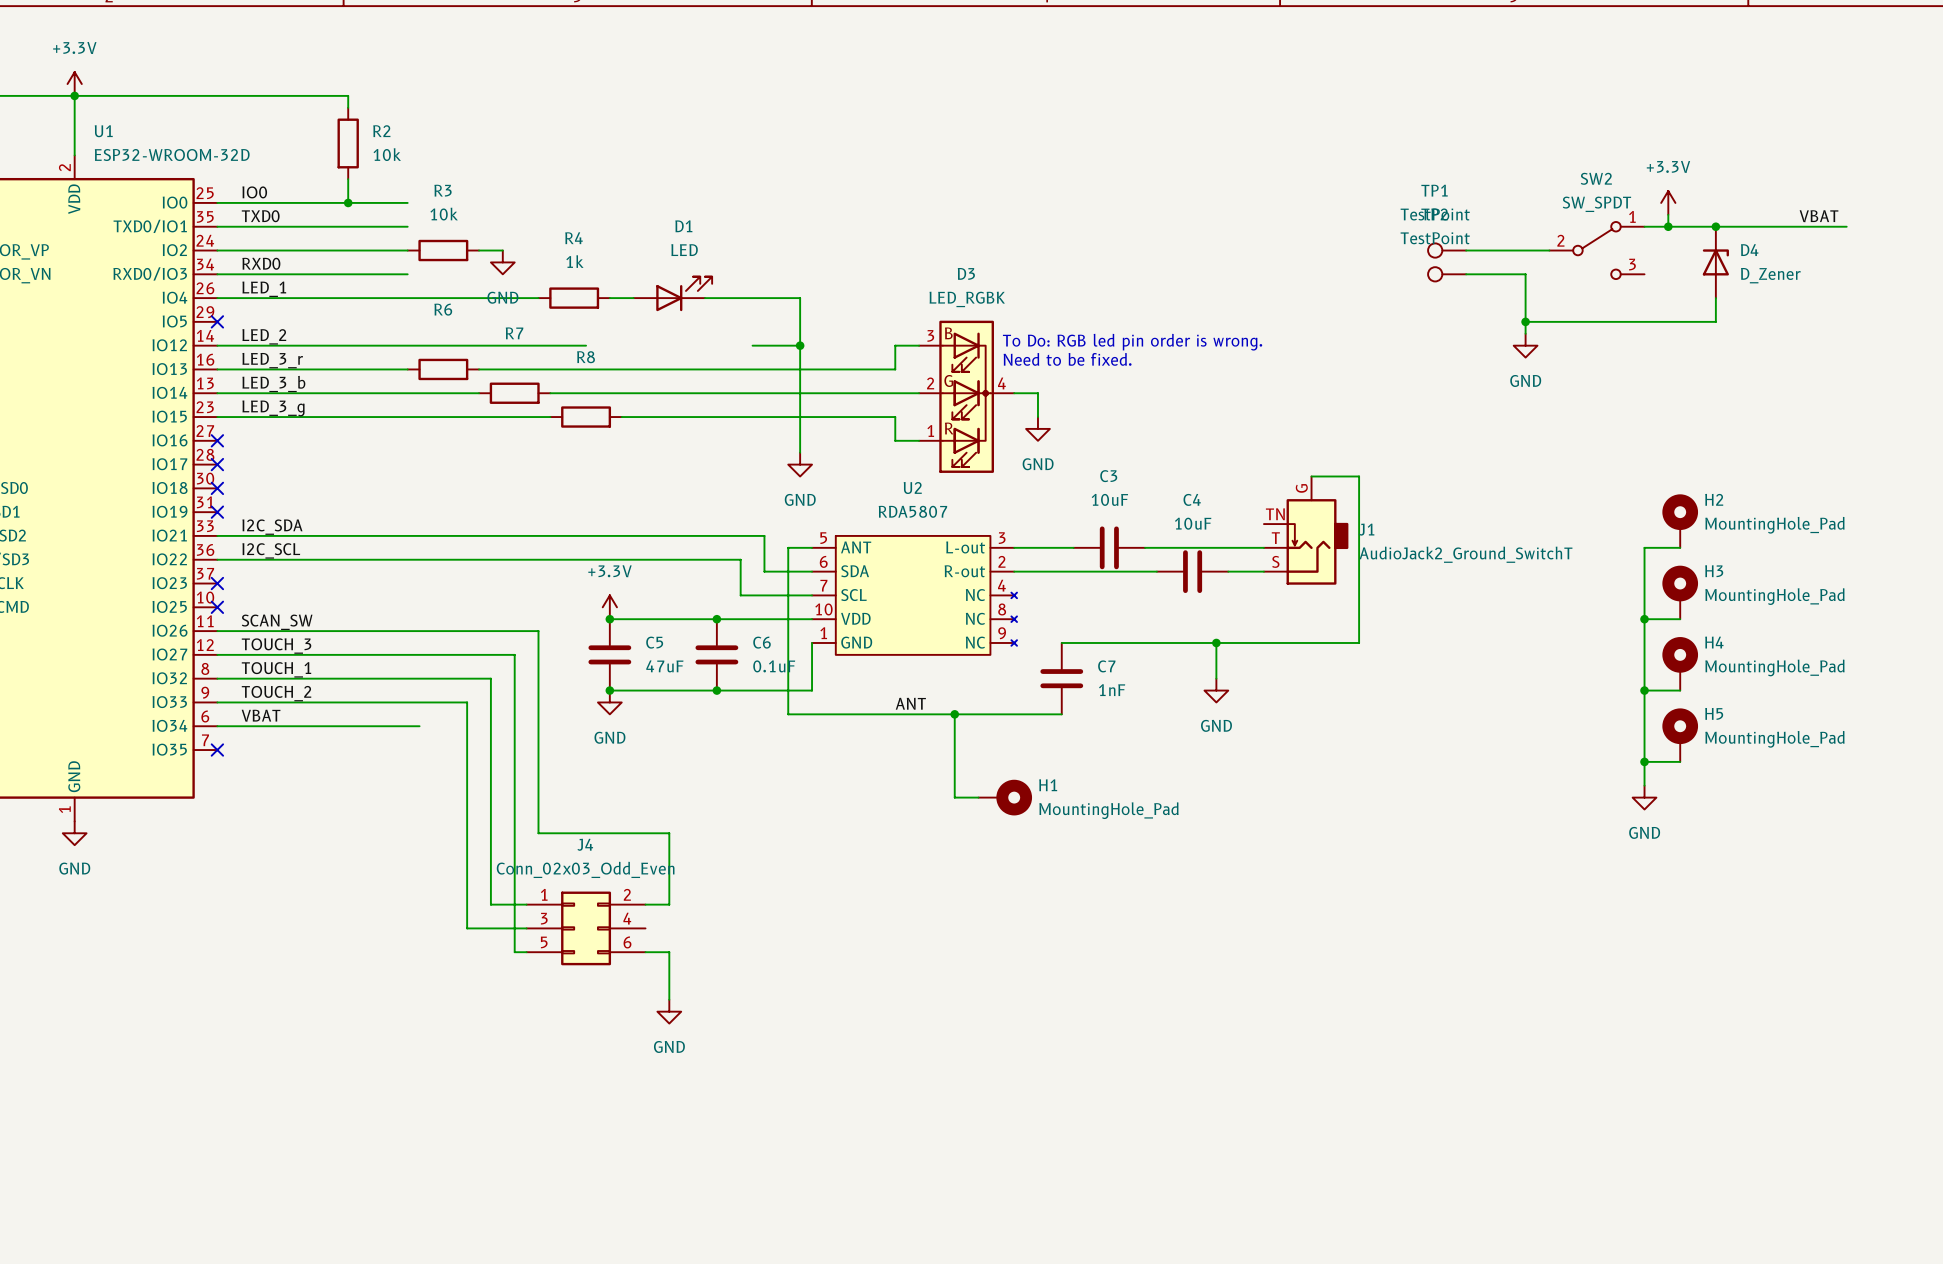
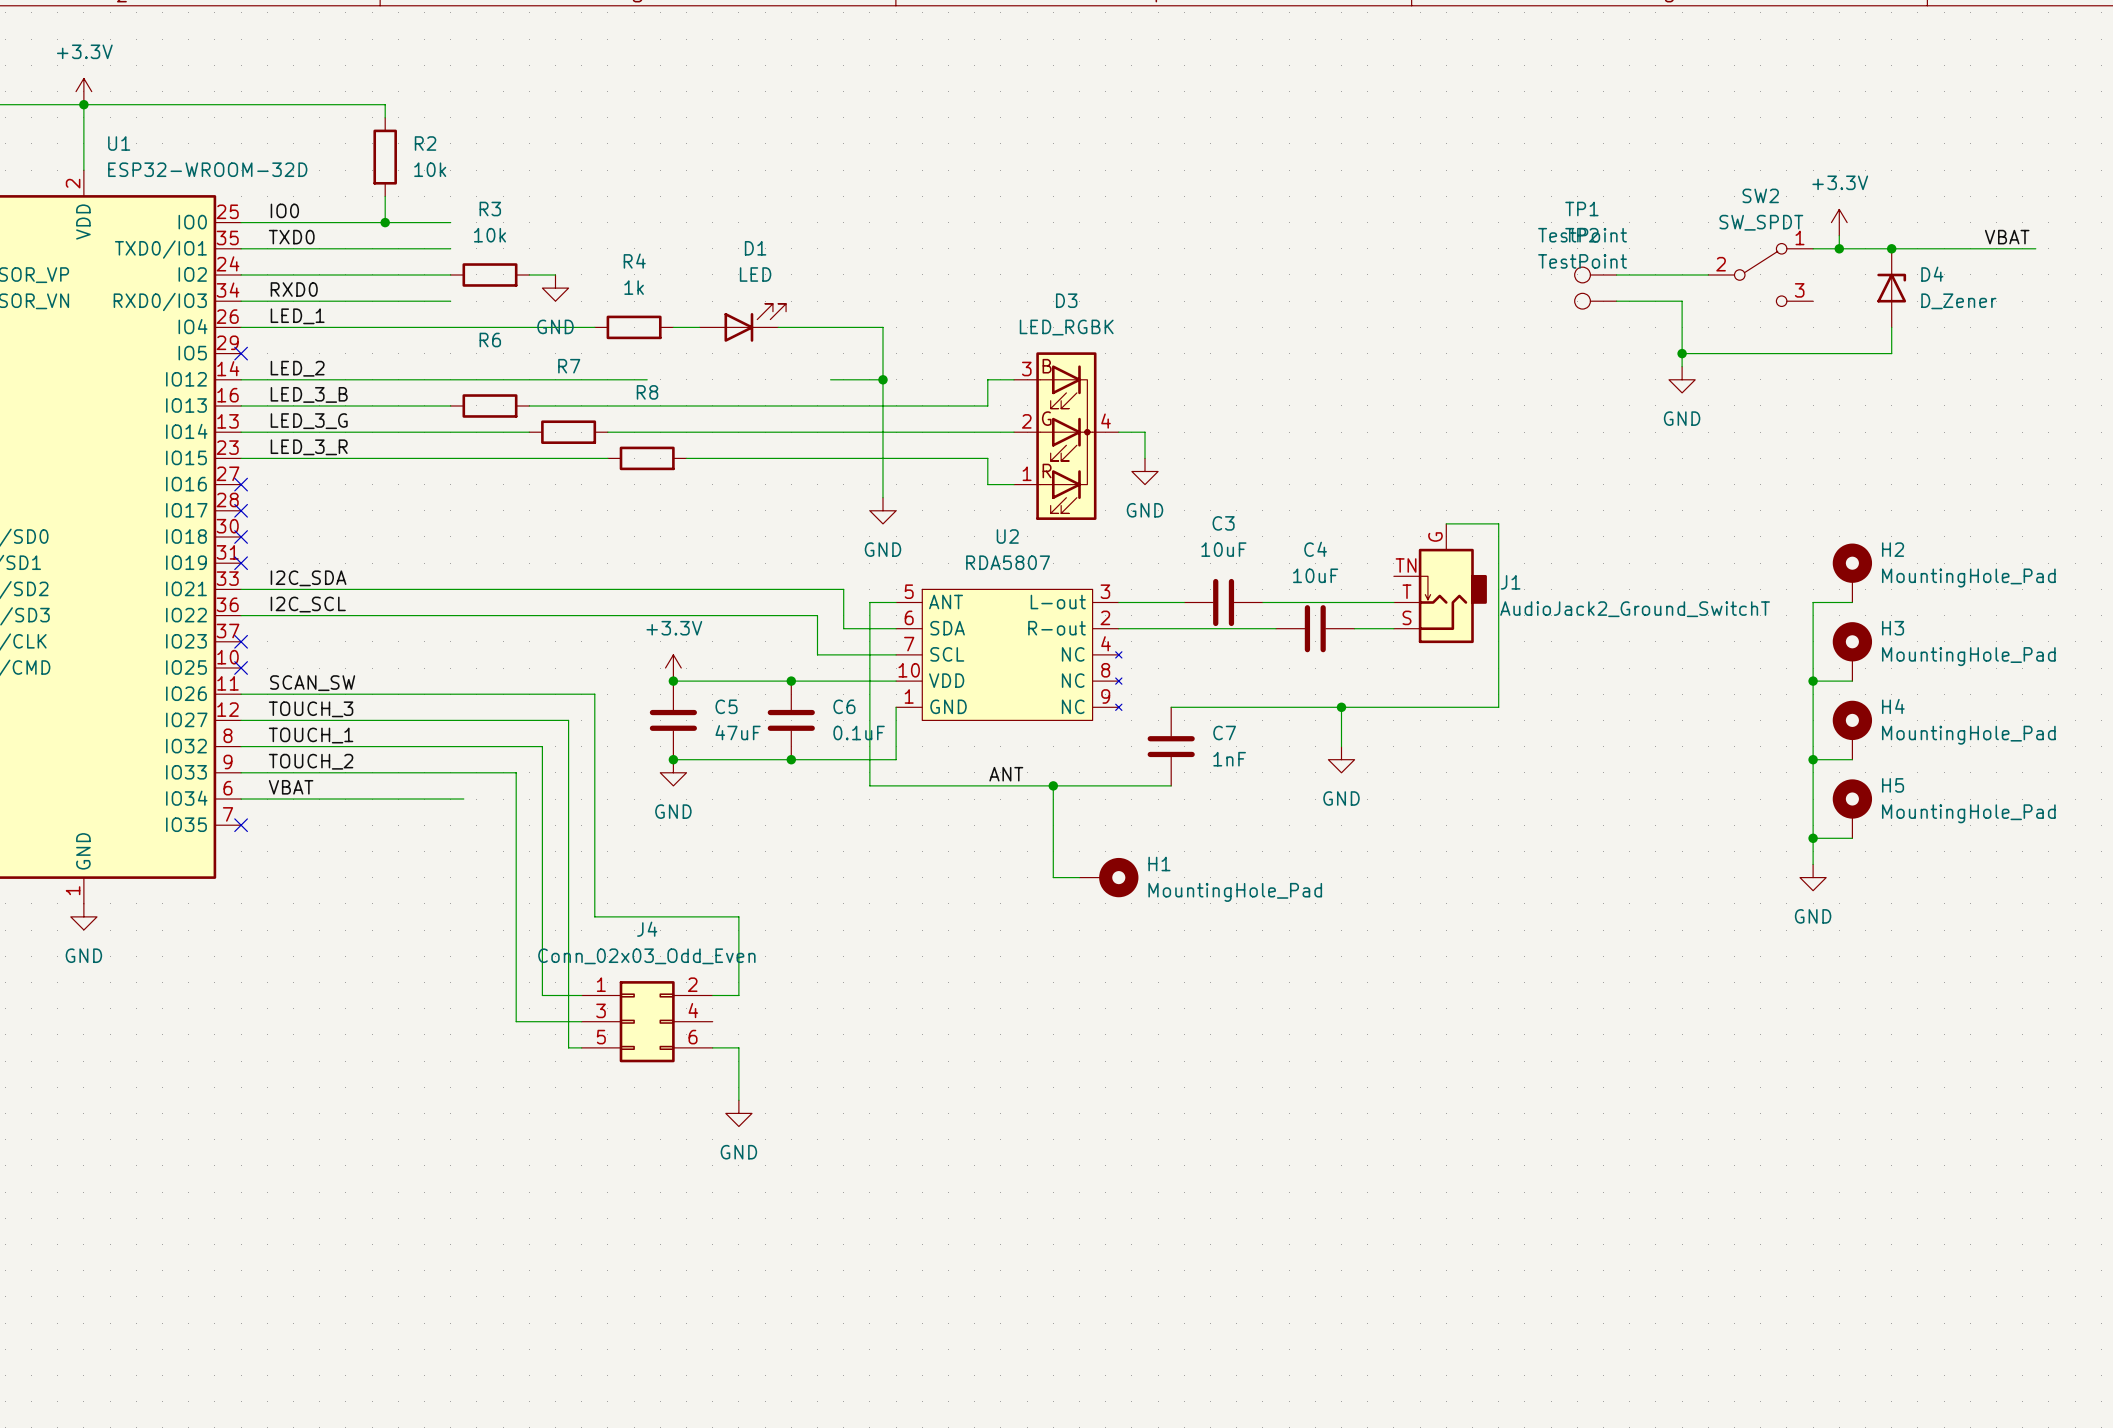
text: To Do: RGB led pin order is wrong. (1132, 342) -> none
text: Need to be fixed. (1067, 359) -> none
label: LED_3_r (272, 360) -> LED_3_B (309, 394)
label: LED_3_b (273, 384) -> LED_3_G (309, 421)
label: LED_3_g (273, 408) -> LED_3_R (309, 447)

